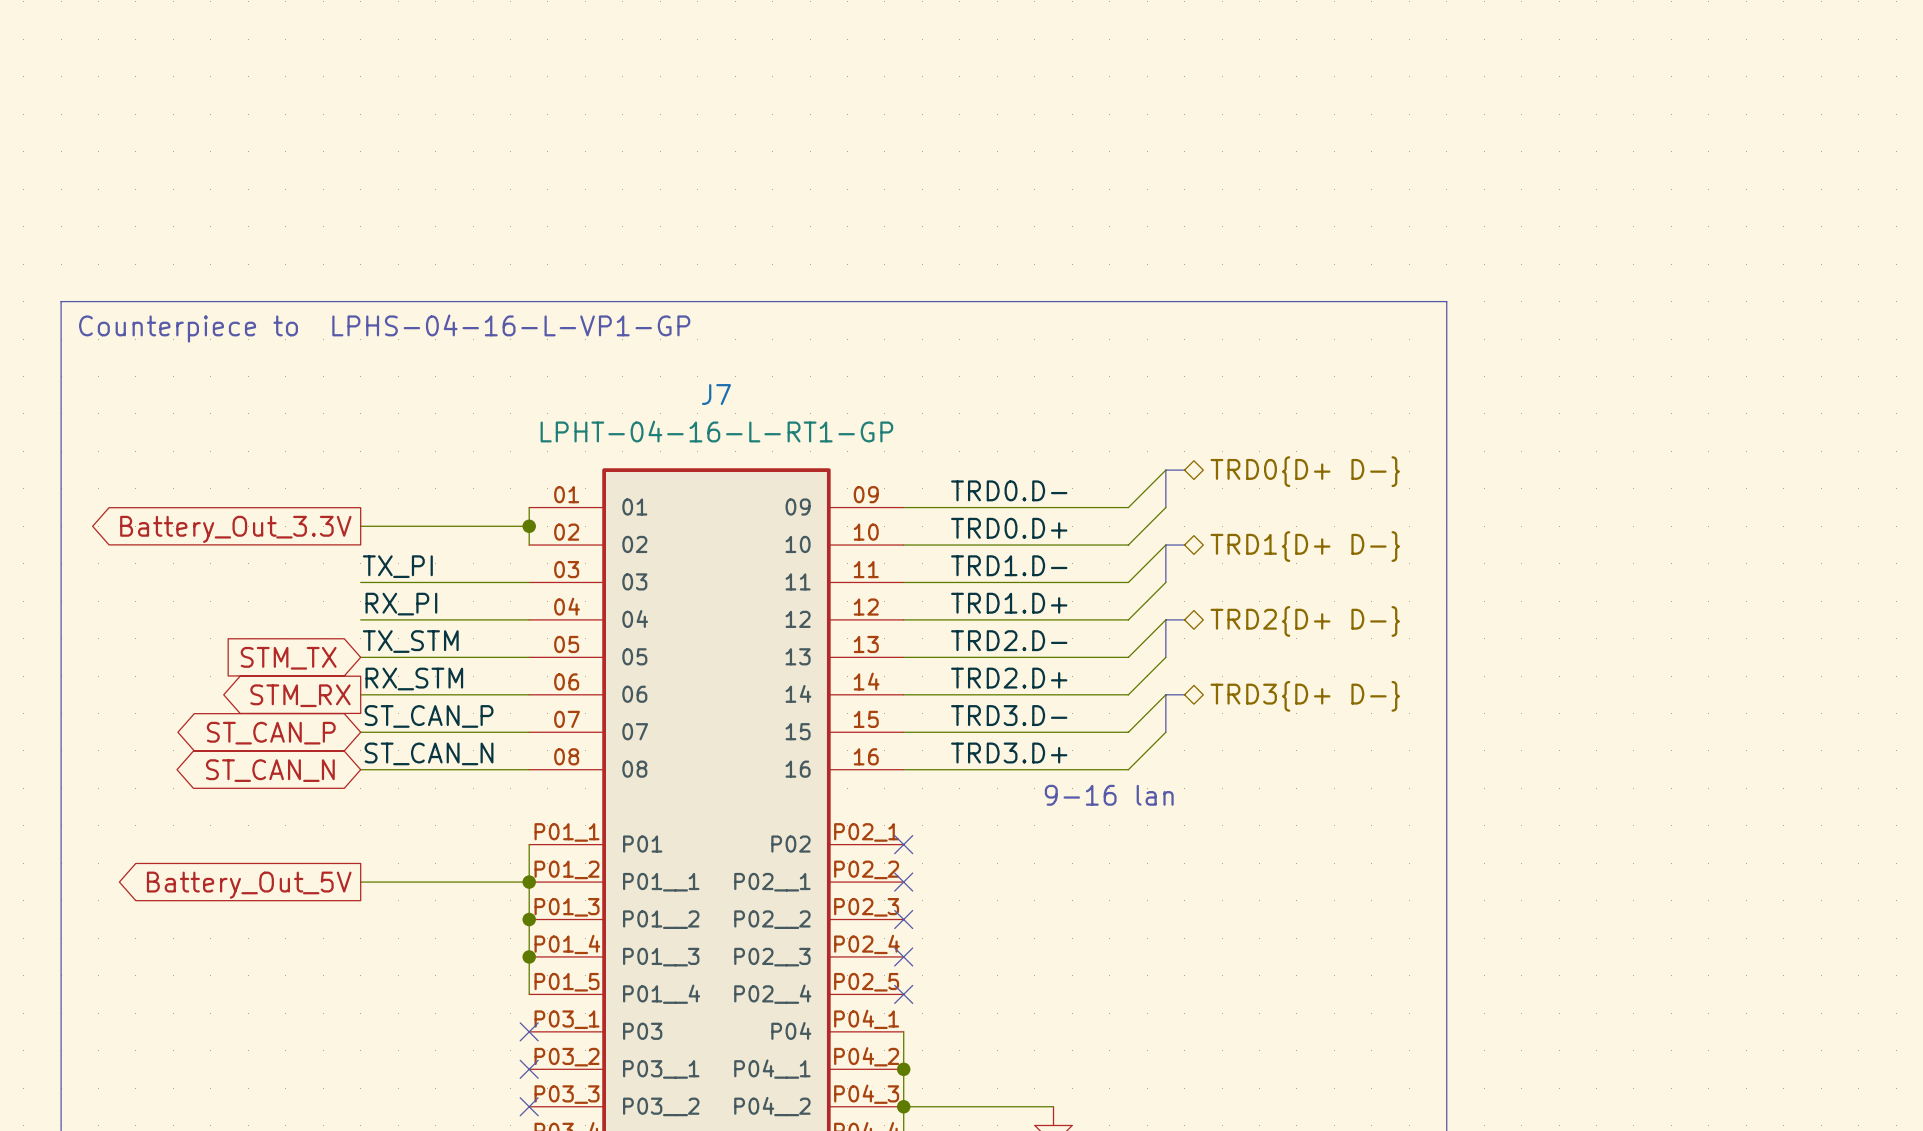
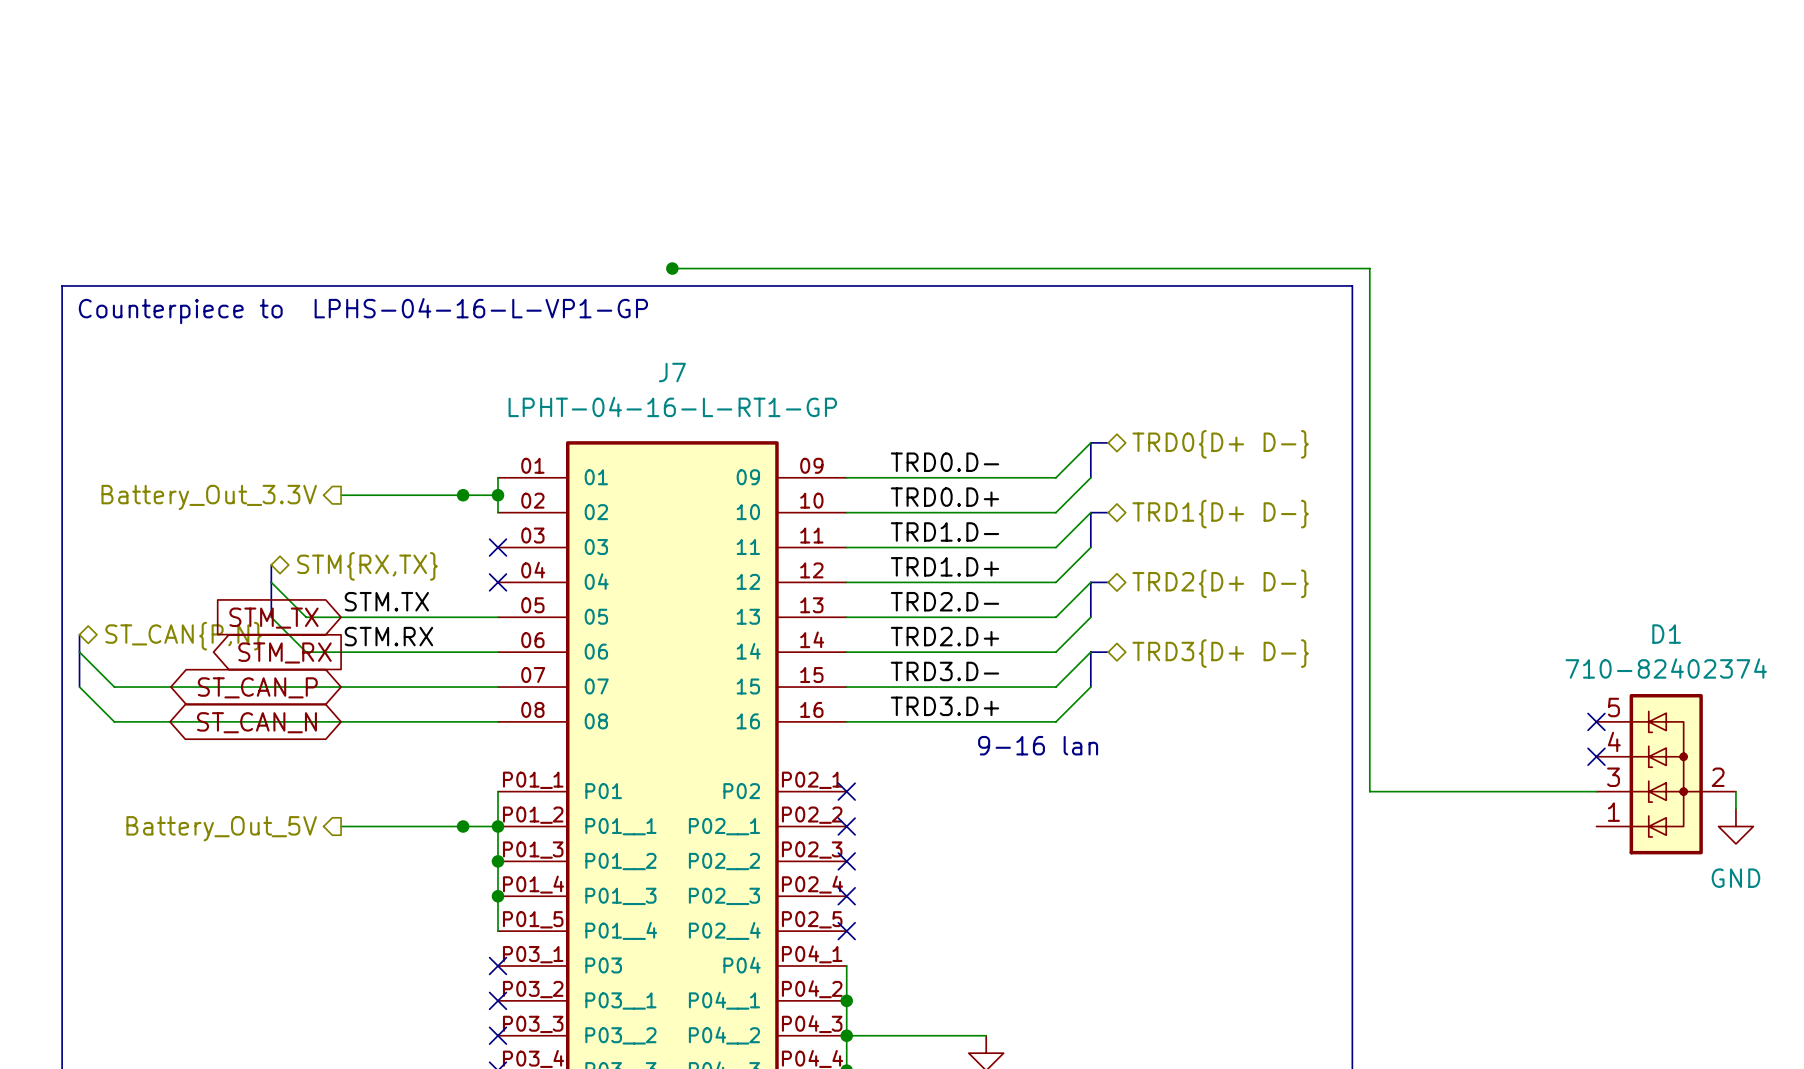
wire: none -> (672, 268) (1369, 268) (1369, 791) (1596, 791)
junction: none -> (672, 268)
junction: none -> (463, 495)
hierarchical label: none -> Battery_Out_3.3V (209, 497)
global label: Battery_Out_3.3V (235, 529) -> none
label: TX_PI (397, 566) -> none
wire: (360, 582) (529, 582) -> none
no-connect mark: none -> (497, 547)
bus: none -> (271, 564) (271, 617)
hierarchical label: none -> STM{RX,TX} (367, 566)
label: RX_PI (401, 604) -> none
wire: none -> (271, 582) (306, 617) (341, 617)
wire: (360, 619) (529, 619) -> none
no-connect mark: none -> (497, 582)
label: TX_STM (410, 641) -> STM.TX (386, 601)
wire: none -> (271, 617) (306, 652) (341, 652)
bus: none -> (79, 634) (79, 687)
hierarchical label: none -> ST_CAN{P,N} (183, 636)
label: RX_STM (414, 678) -> STM.RX (388, 636)
wire: none -> (79, 652) (114, 687) (341, 687)
label: ST_CAN_P (429, 716) -> none
wire: none -> (79, 687) (114, 721) (341, 721)
label: ST_CAN_N (429, 753) -> none
no-connect mark: none -> (1596, 721)
no-connect mark: none -> (1596, 756)
D1: none -> 710-82402374 (1666, 774)
wire: none -> (1735, 791) (1735, 809)
junction: none -> (463, 826)
power symbol: none -> GND (1735, 826)
hierarchical label: none -> Battery_Out_5V (221, 828)
global label: Battery_Out_5V (249, 885) -> none

